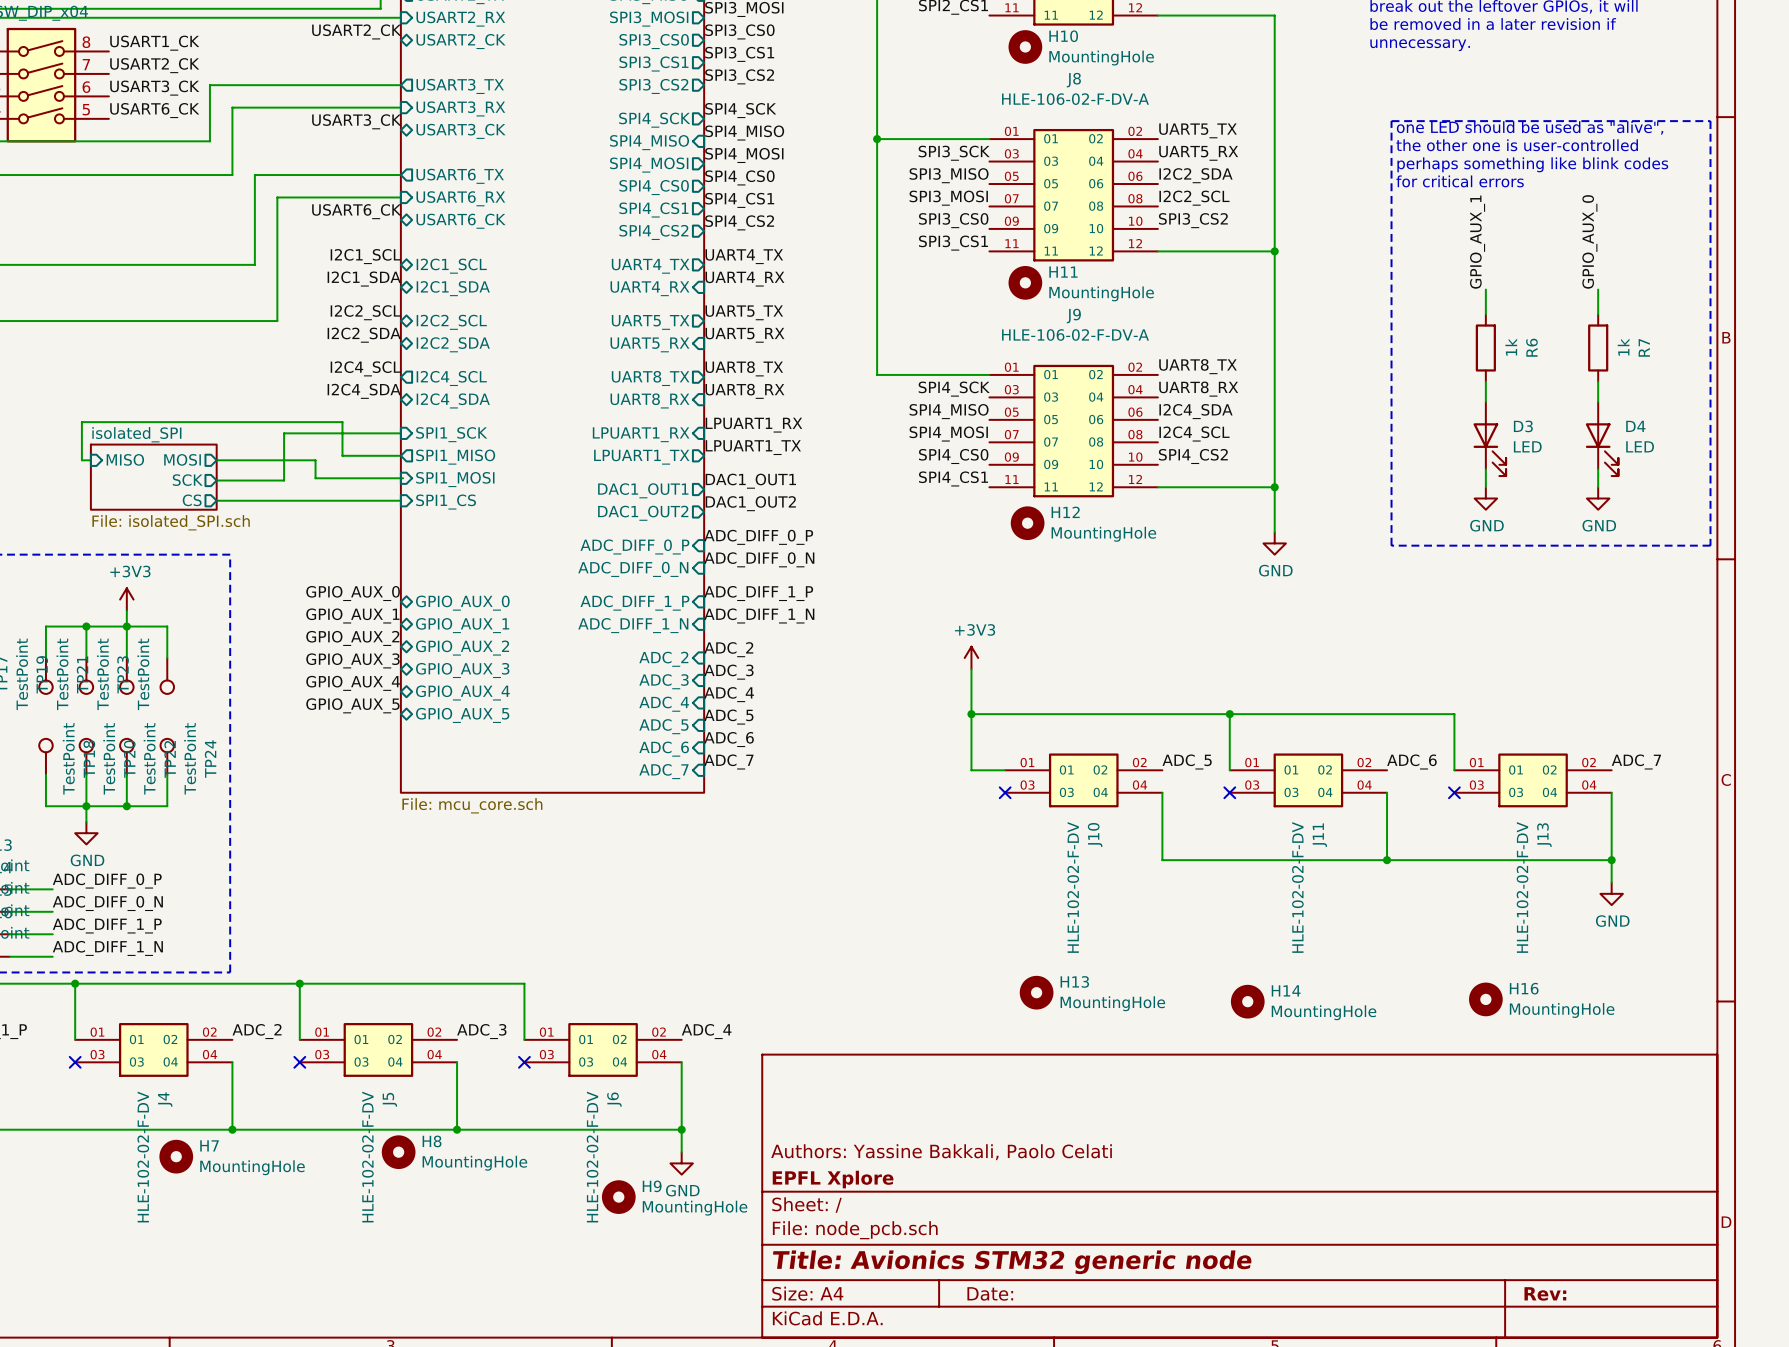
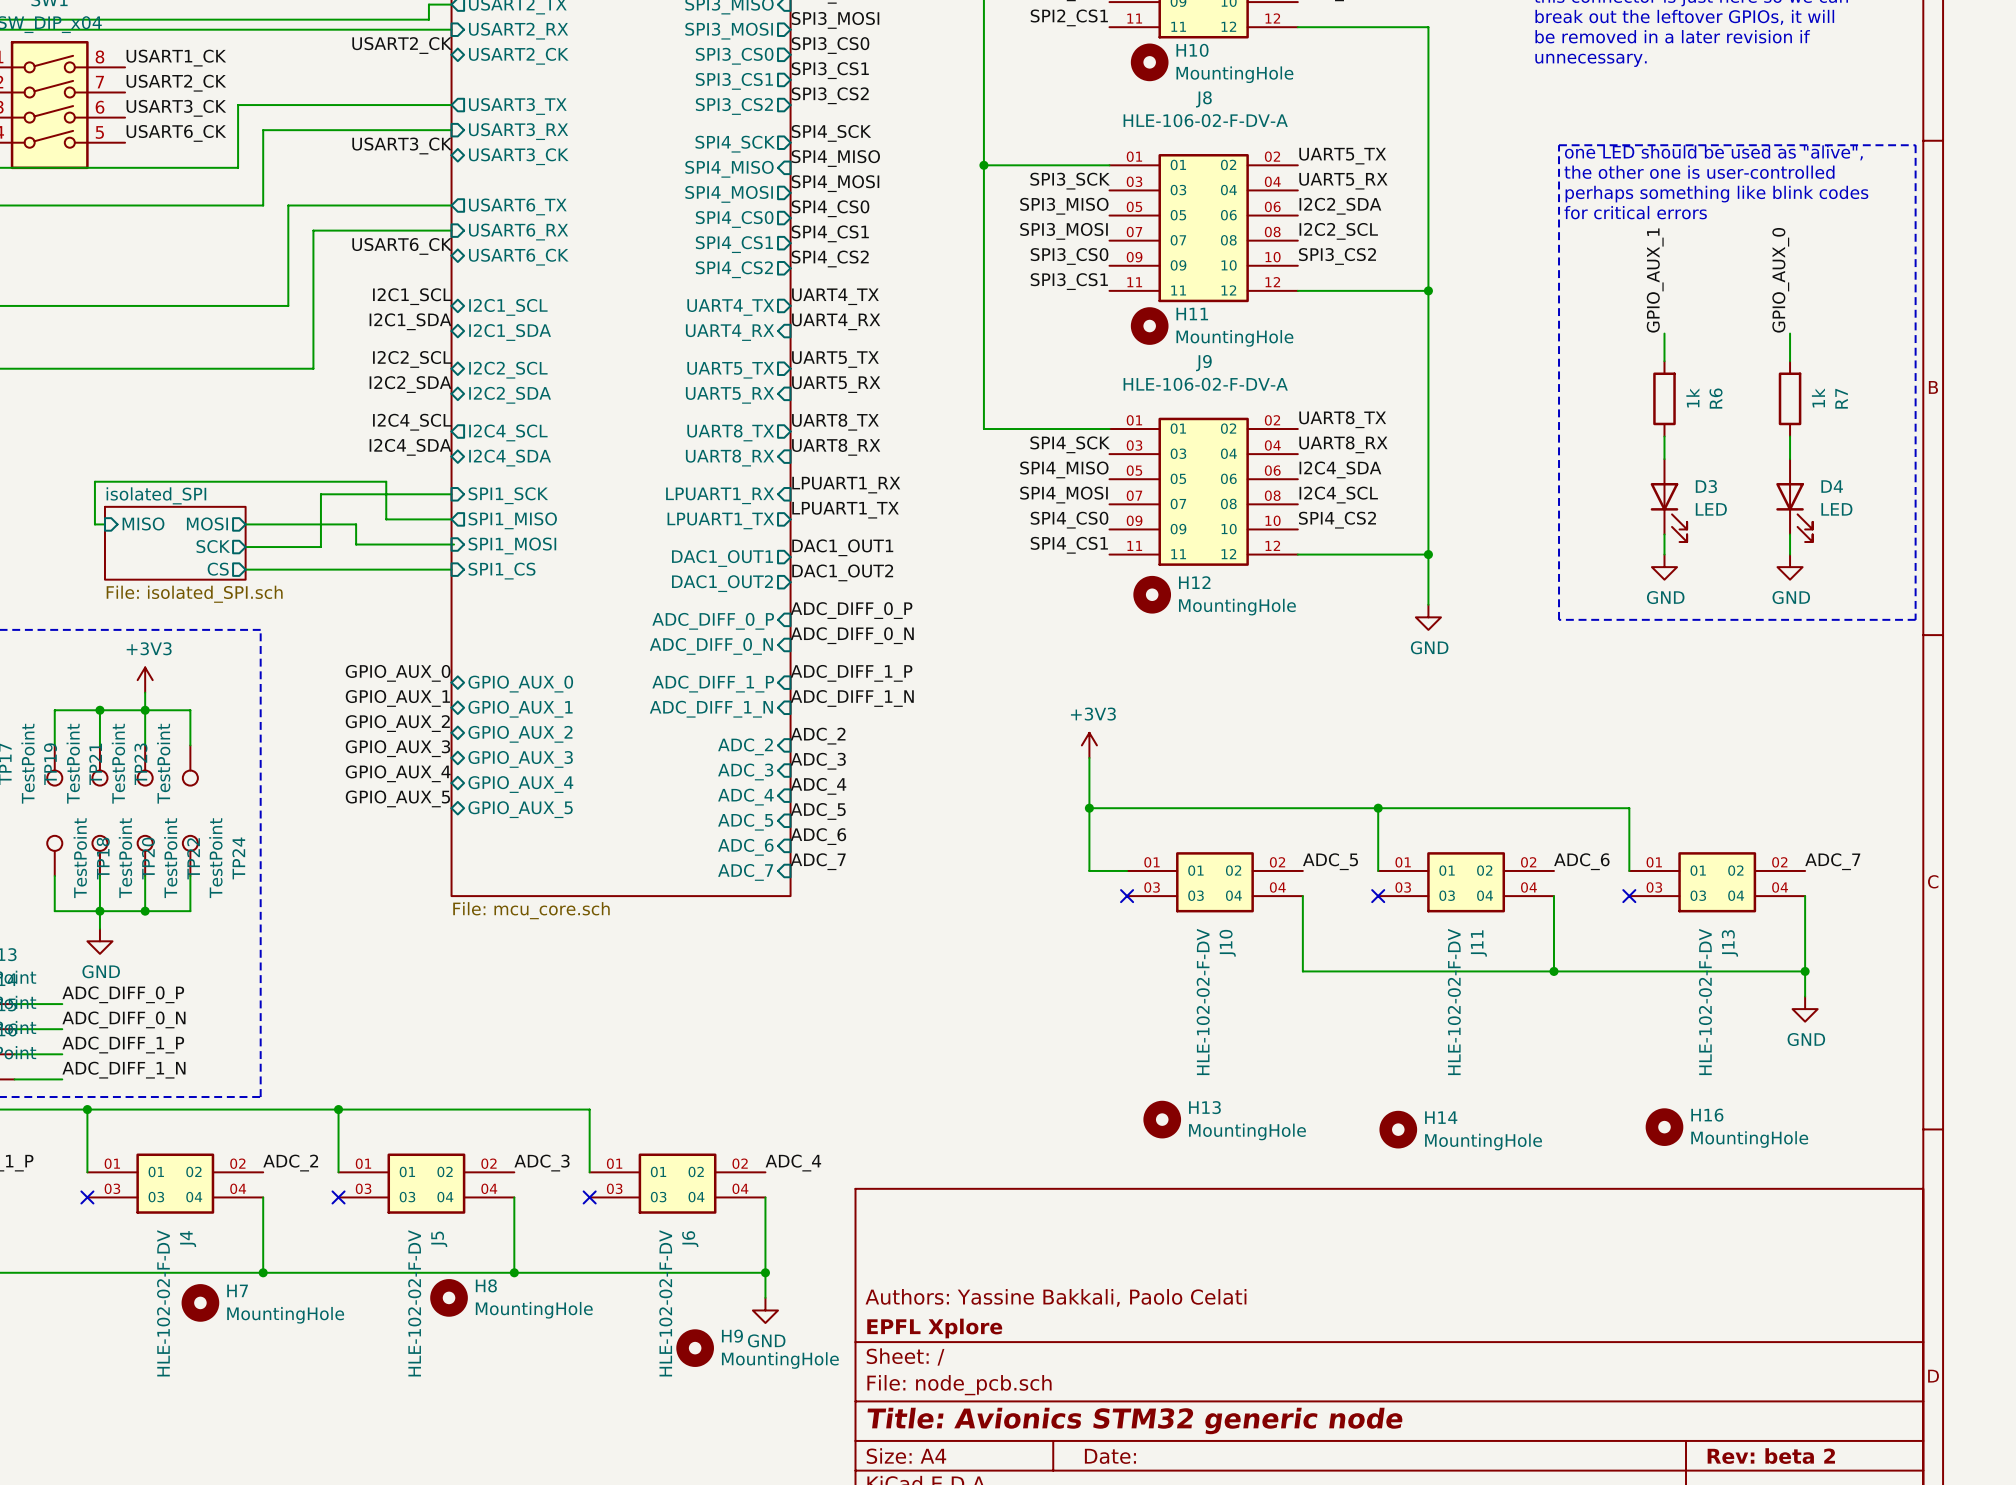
title block: Rev: (1545, 1293) -> Rev: beta 2 (1771, 1456)

